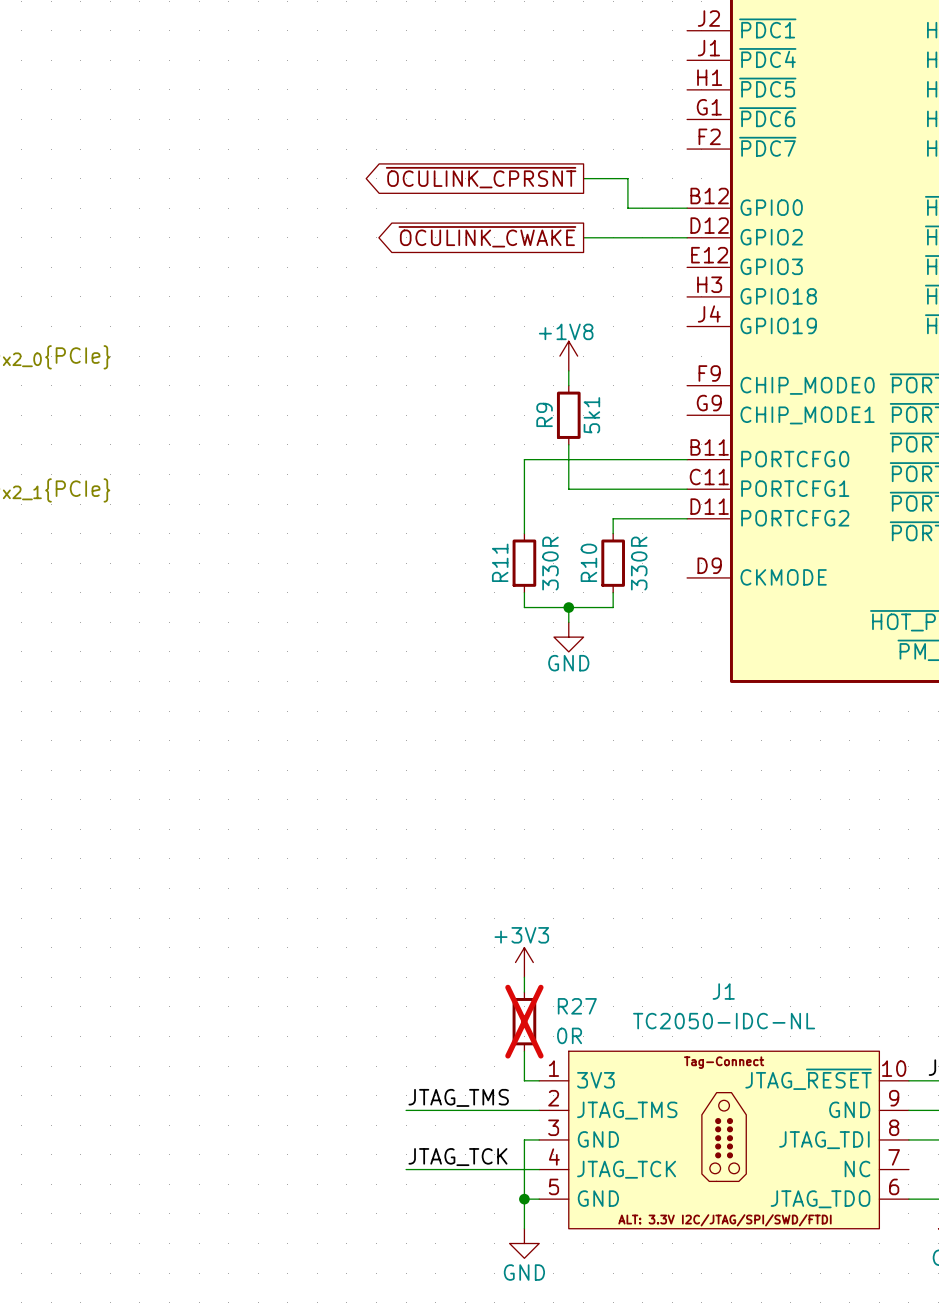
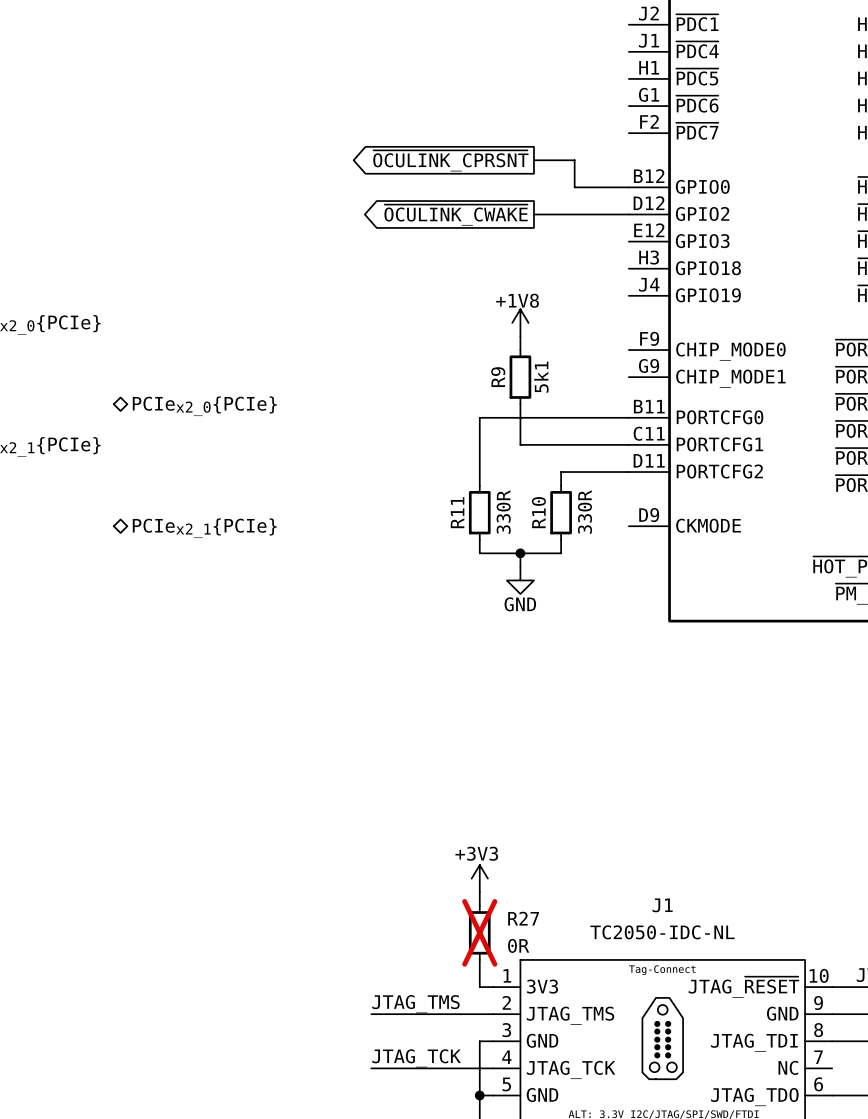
hierarchical label: none -> PCIex2_0{PCIe} (204, 406)
hierarchical label: none -> PCIex2_1{PCIe} (204, 528)

